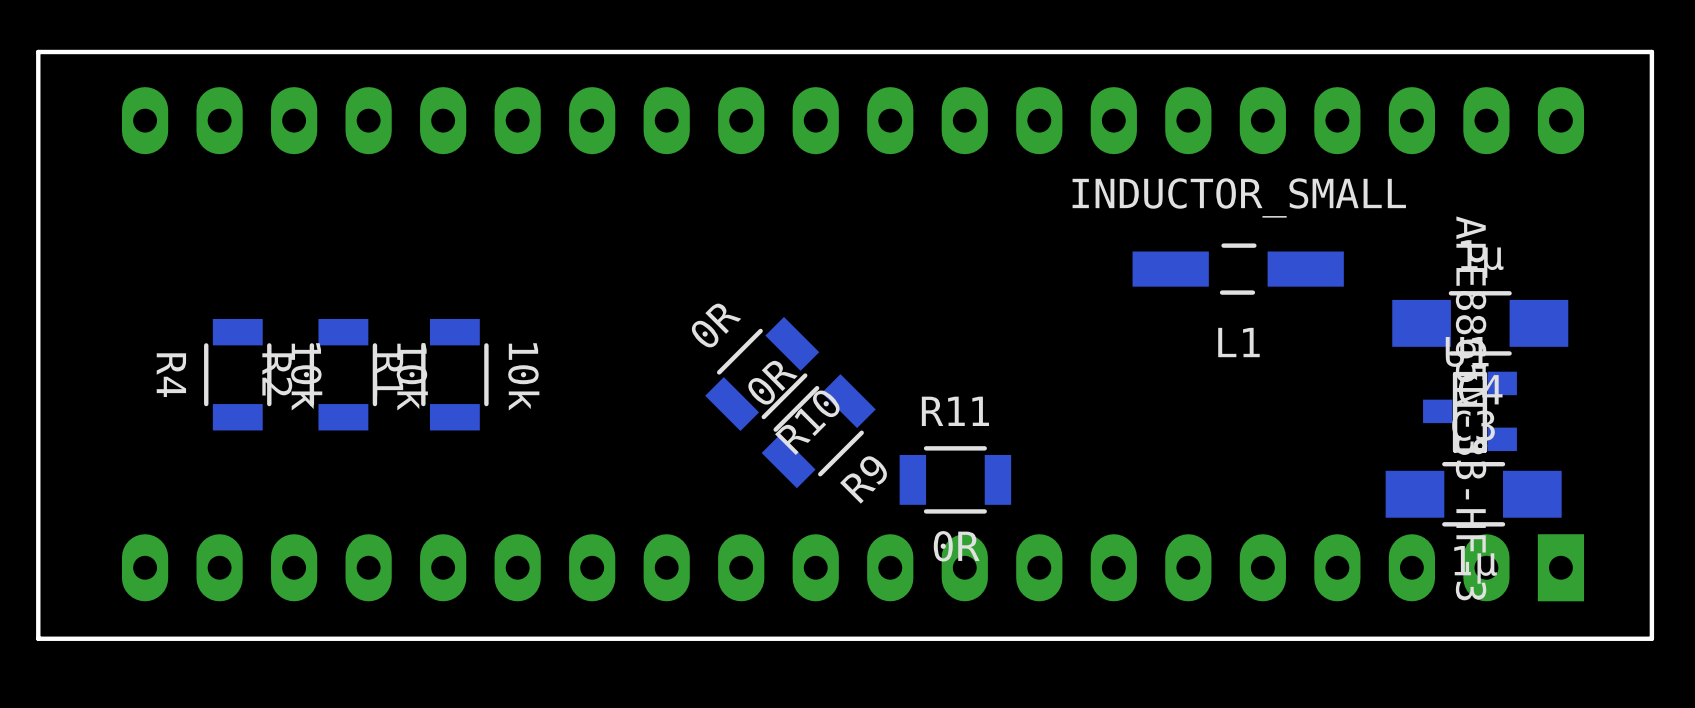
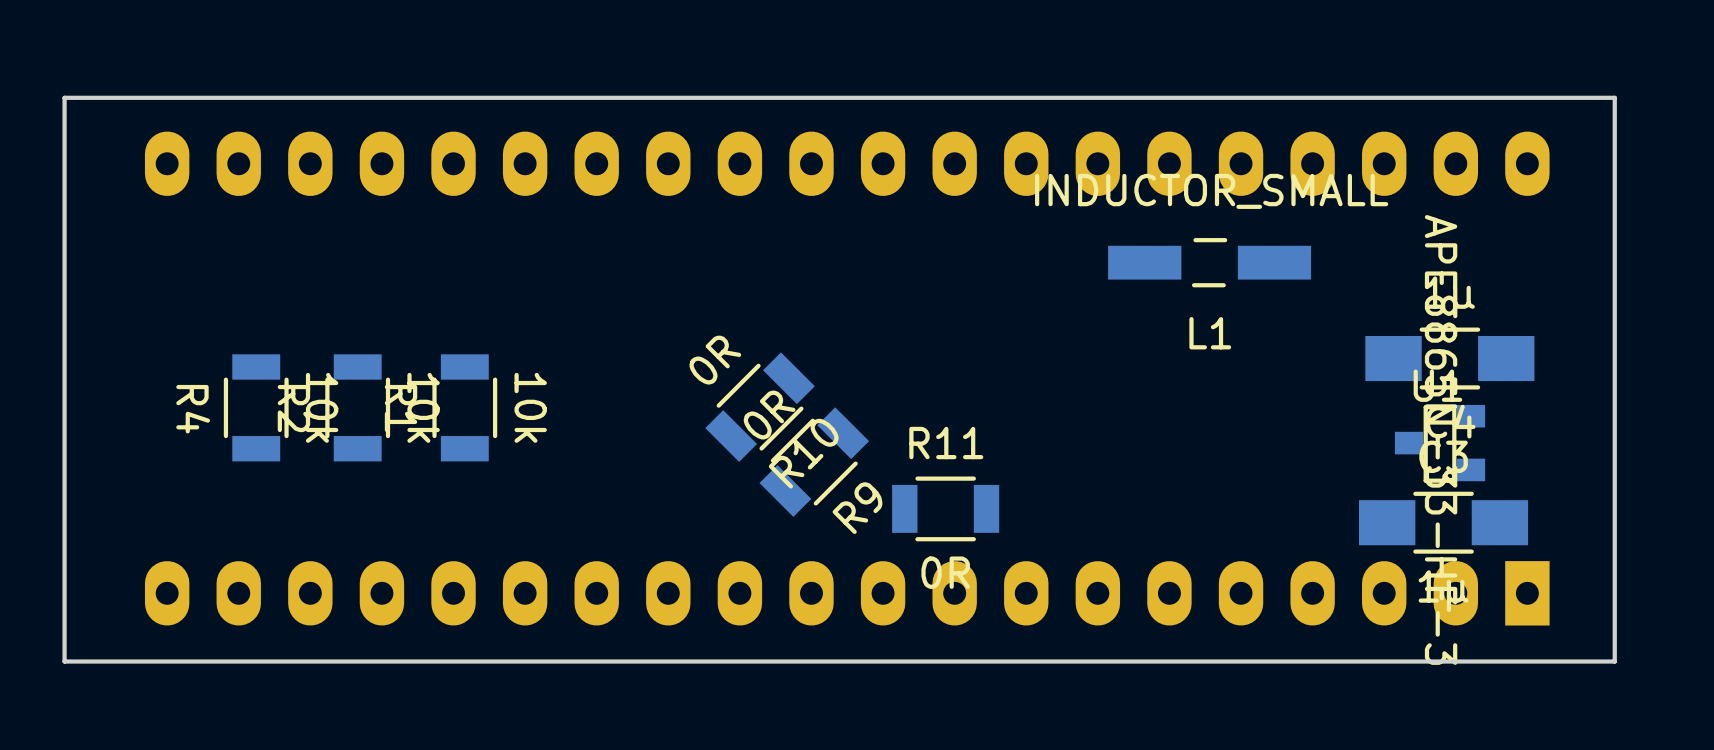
L1 position: (1238, 269) -> (1209, 262)

